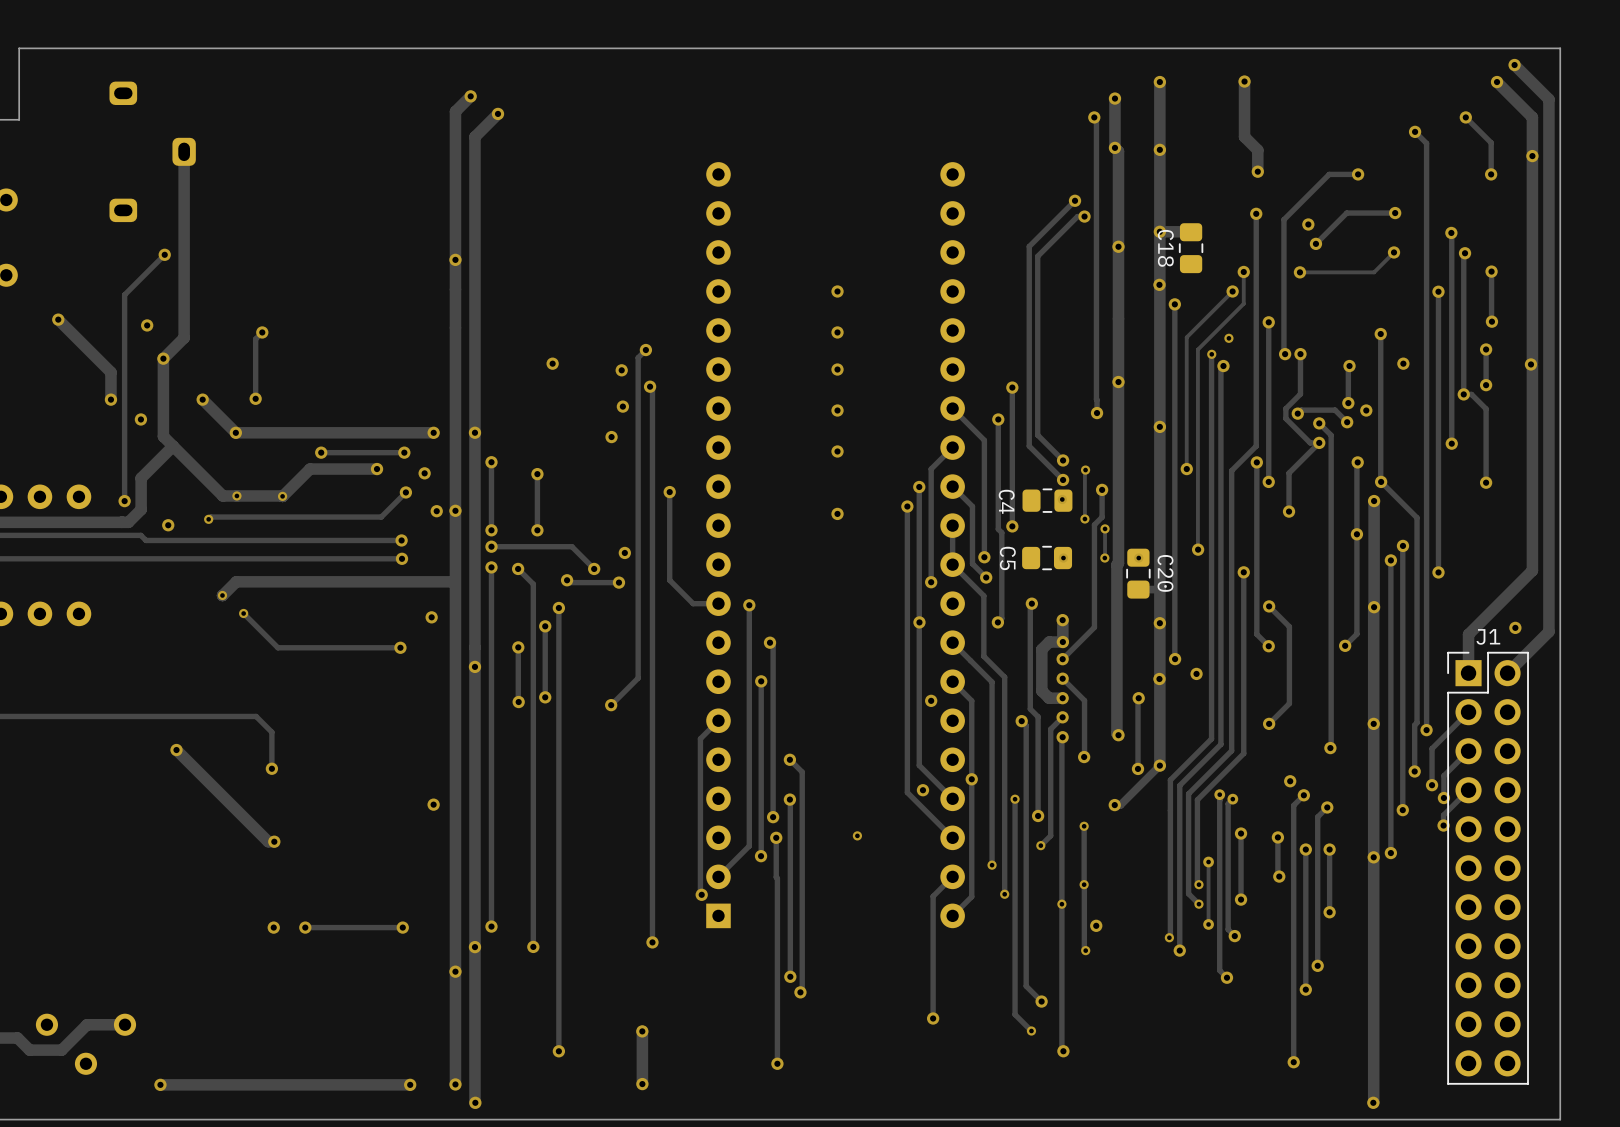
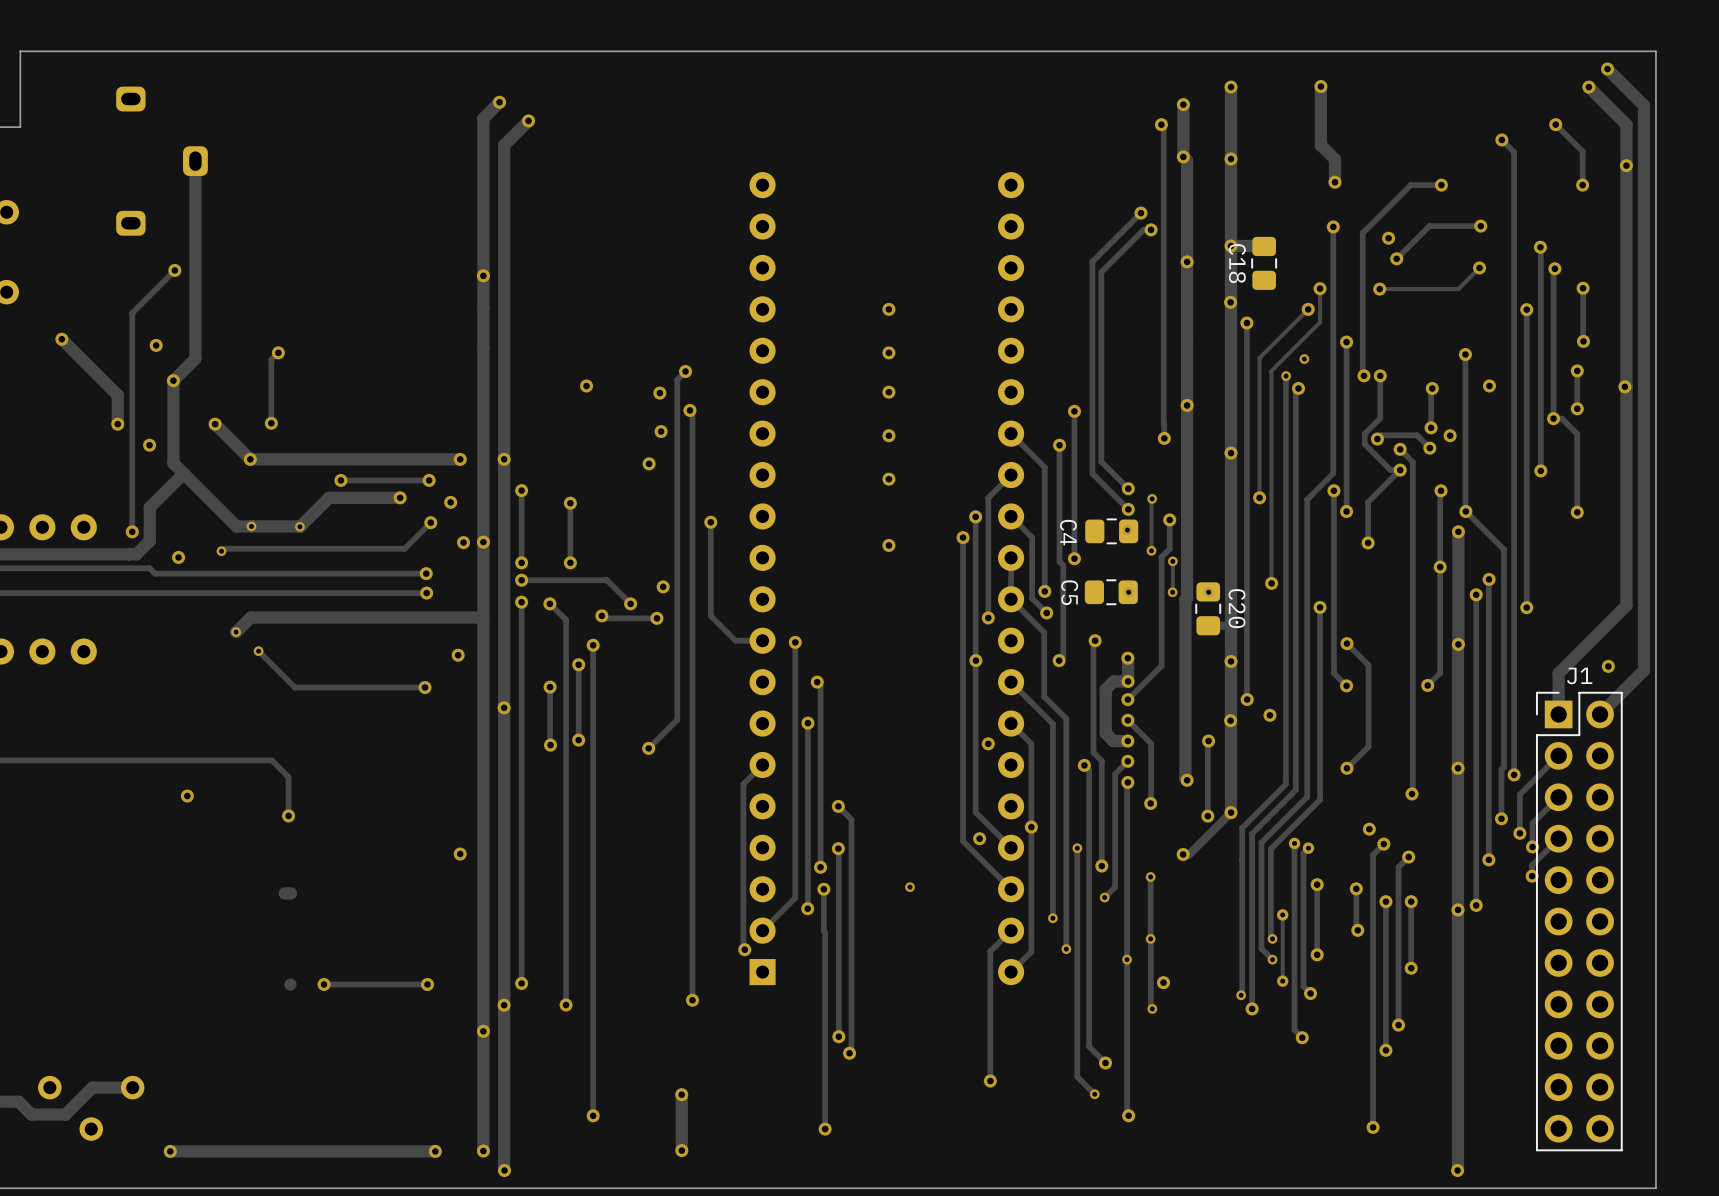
track: (176, 750) (268, 841) -> none
via: (274, 841) -> none
via: (273, 927) -> none

